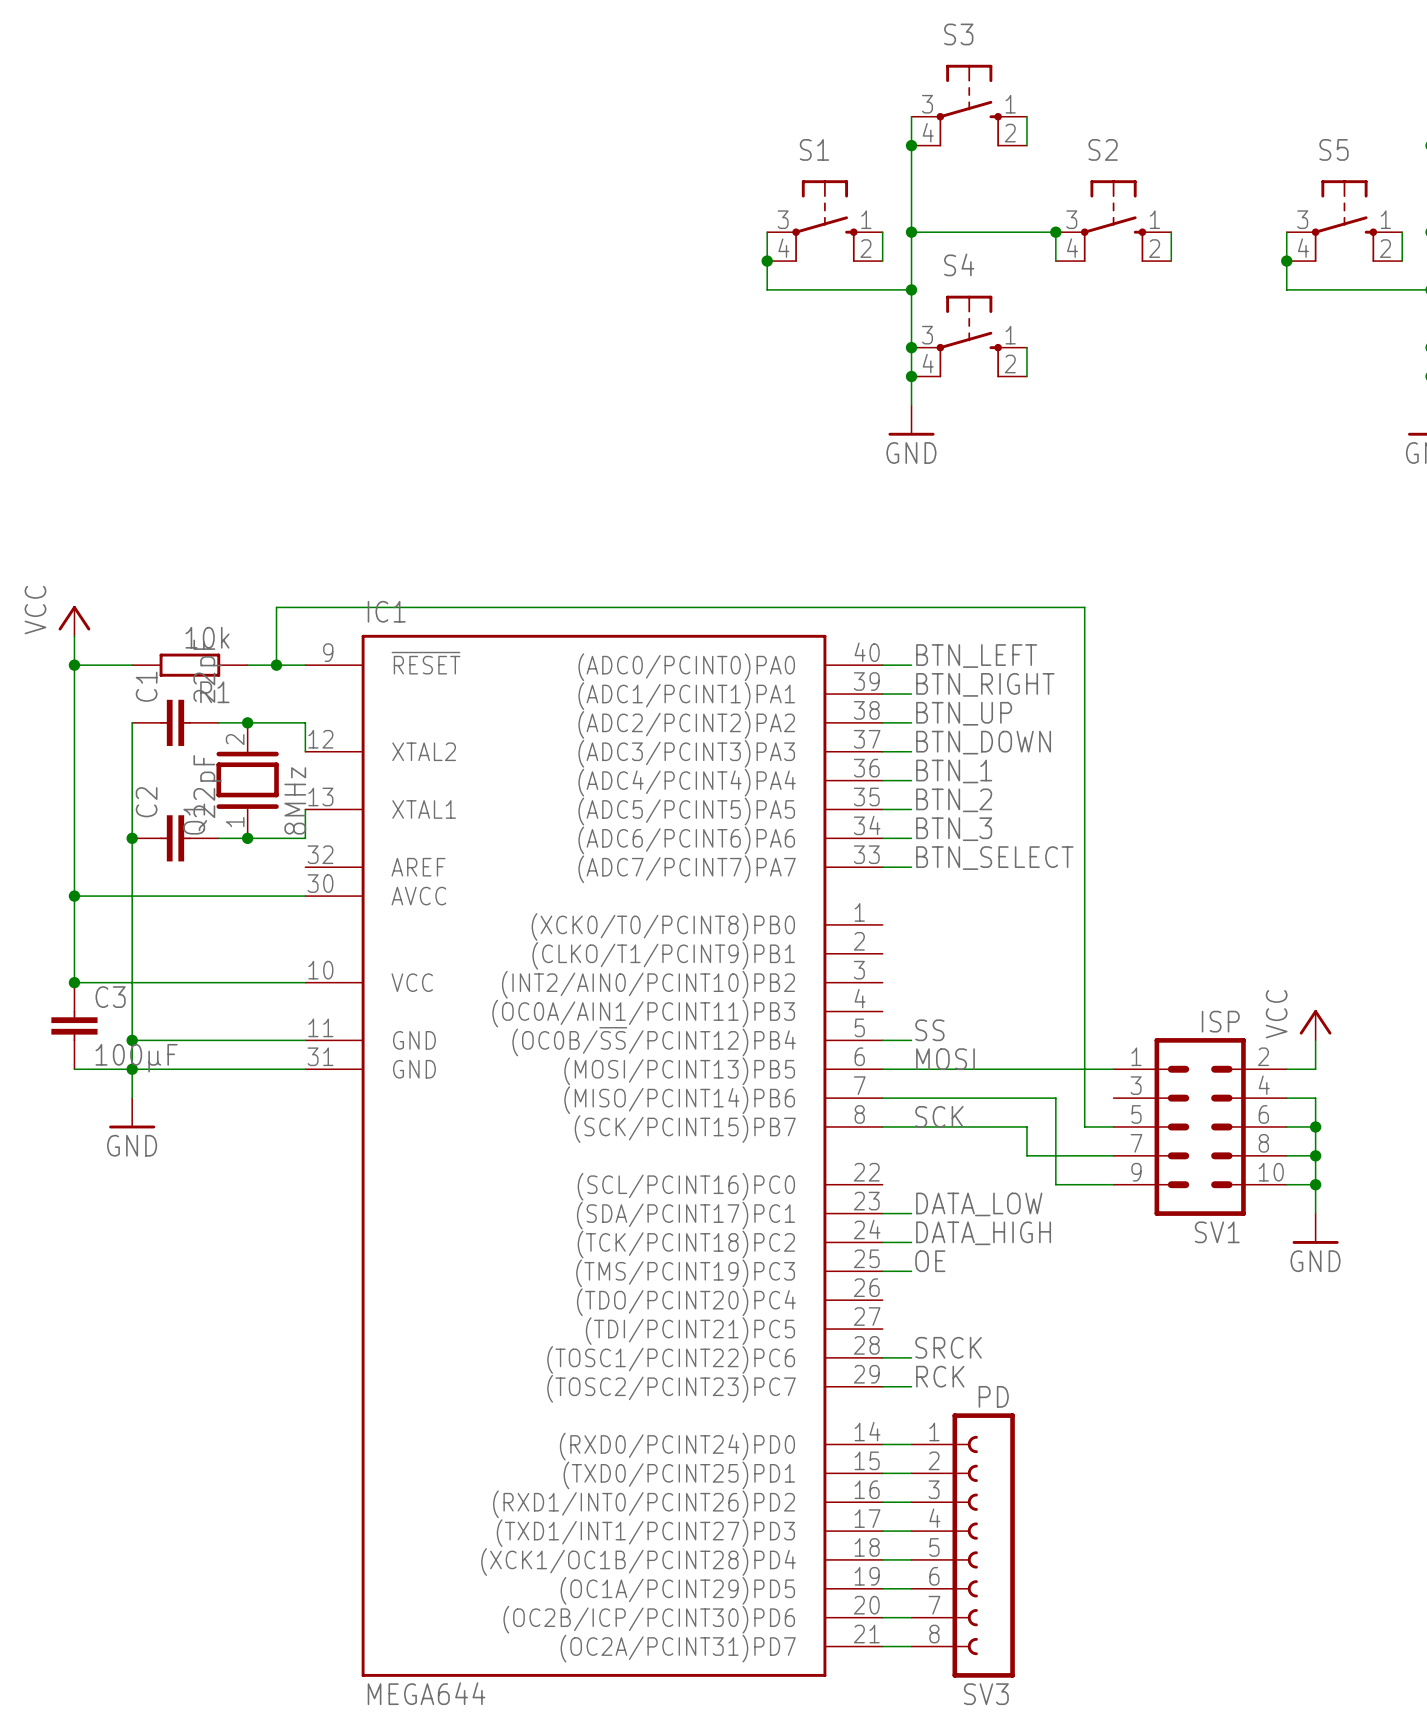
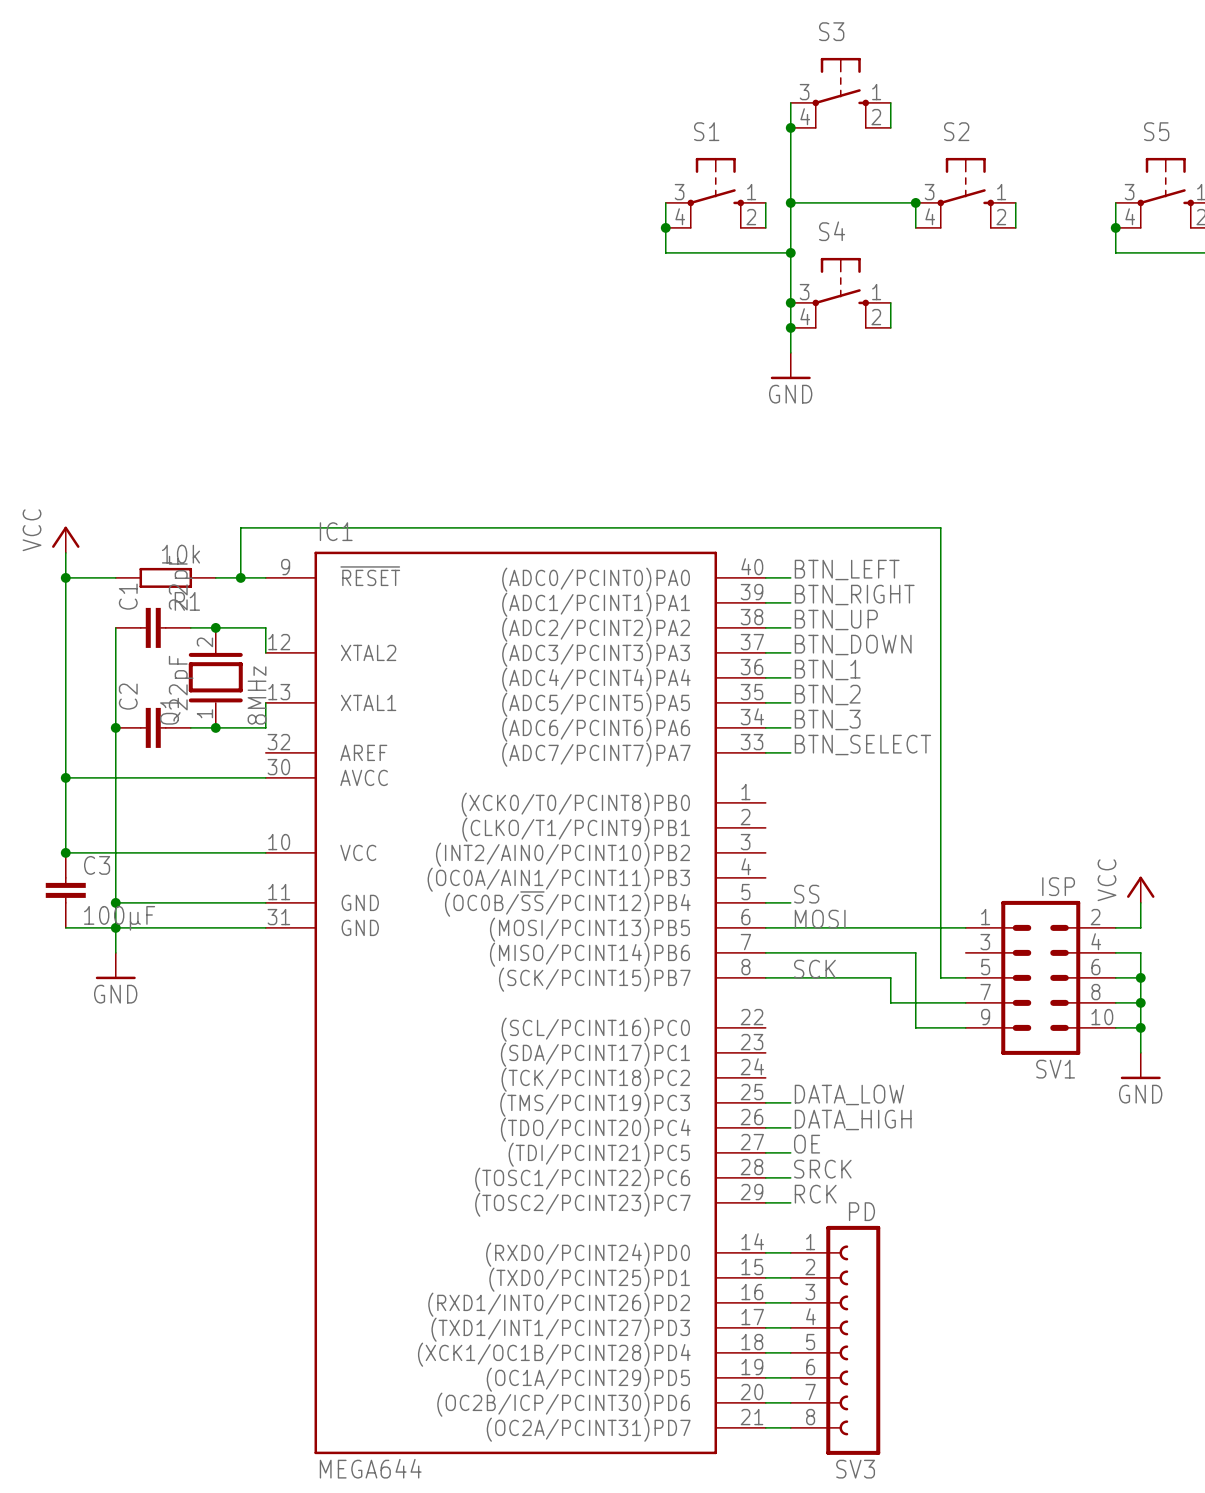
label: DATA_LOW (979, 1204) -> none
wire: (882, 1213) (911, 1213) -> (765, 1152) (790, 1152)
label position: DATA_HIGH (983, 1233) -> DATA_HIGH (853, 1119)
wire: (882, 1242) (911, 1242) -> (765, 1127) (790, 1127)
label: OE (930, 1261) -> DATA_LOW (849, 1094)
label: none -> OE (807, 1144)

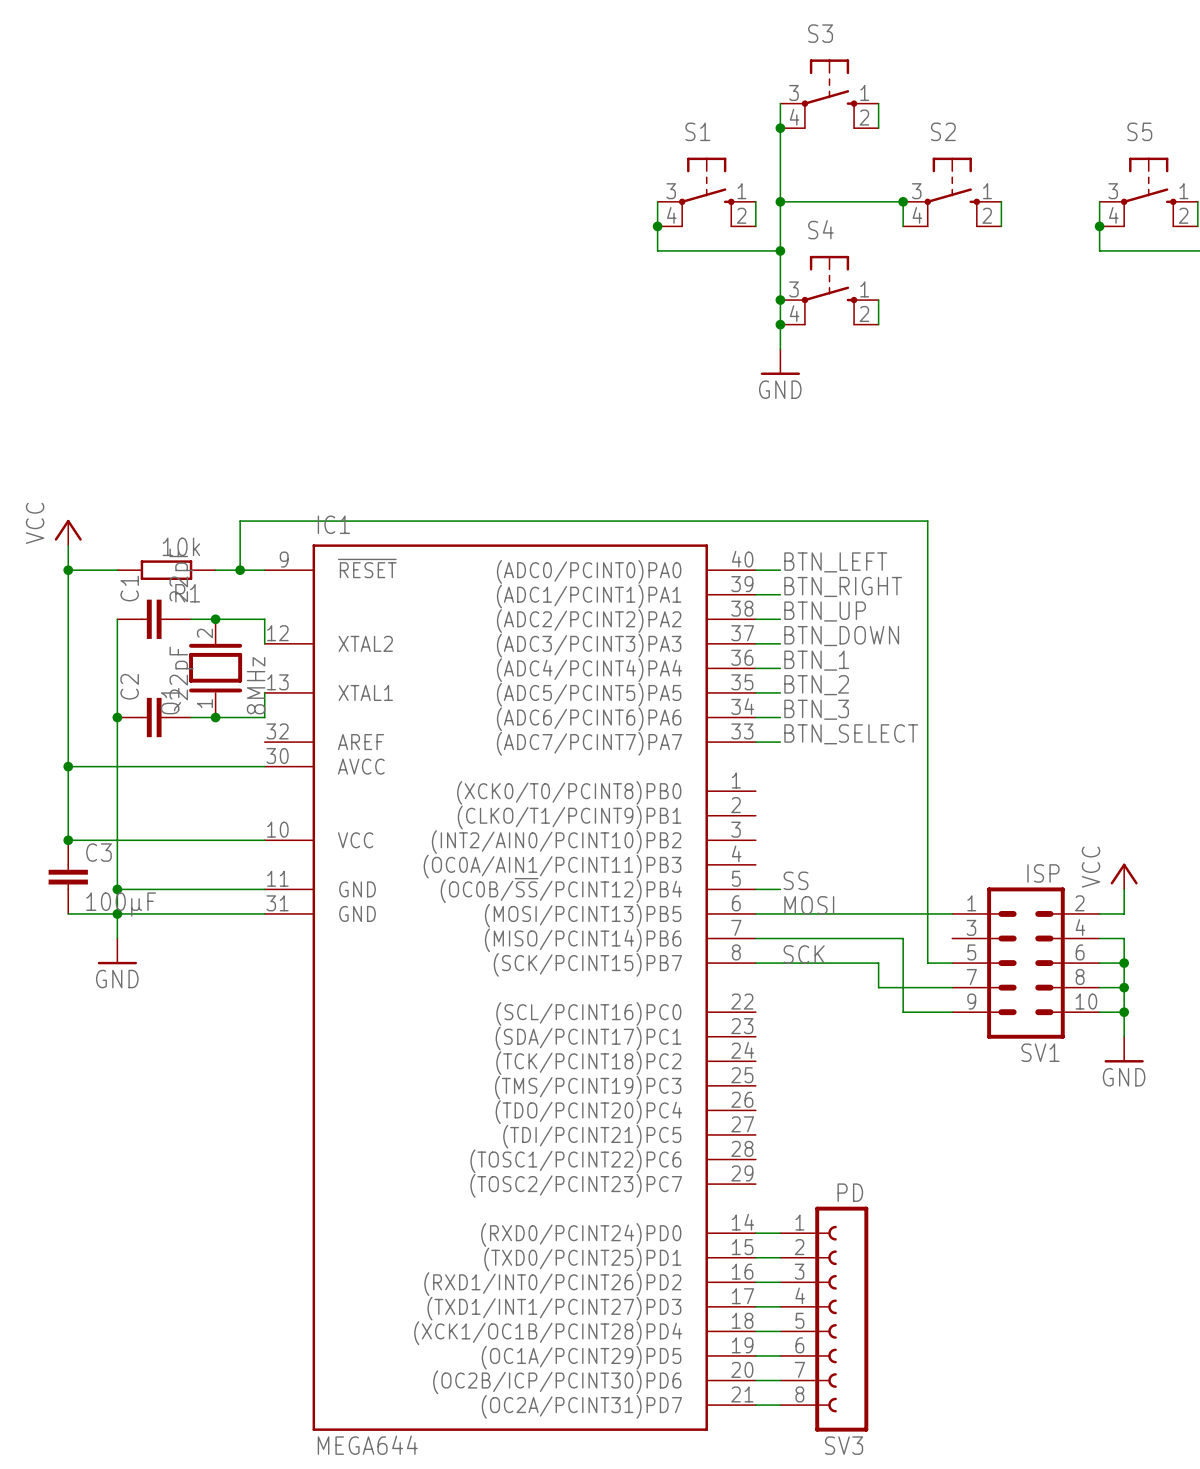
label: DATA_LOW (849, 1094) -> none
wire: (765, 1102) (790, 1102) -> none
label: DATA_HIGH (853, 1119) -> none
wire: (765, 1127) (790, 1127) -> none
label: OE (807, 1144) -> none
wire: (765, 1152) (790, 1152) -> none
label: SRCK (822, 1169) -> none
wire: (765, 1177) (790, 1177) -> none
label: RCK (815, 1194) -> none
wire: (765, 1202) (790, 1202) -> none

